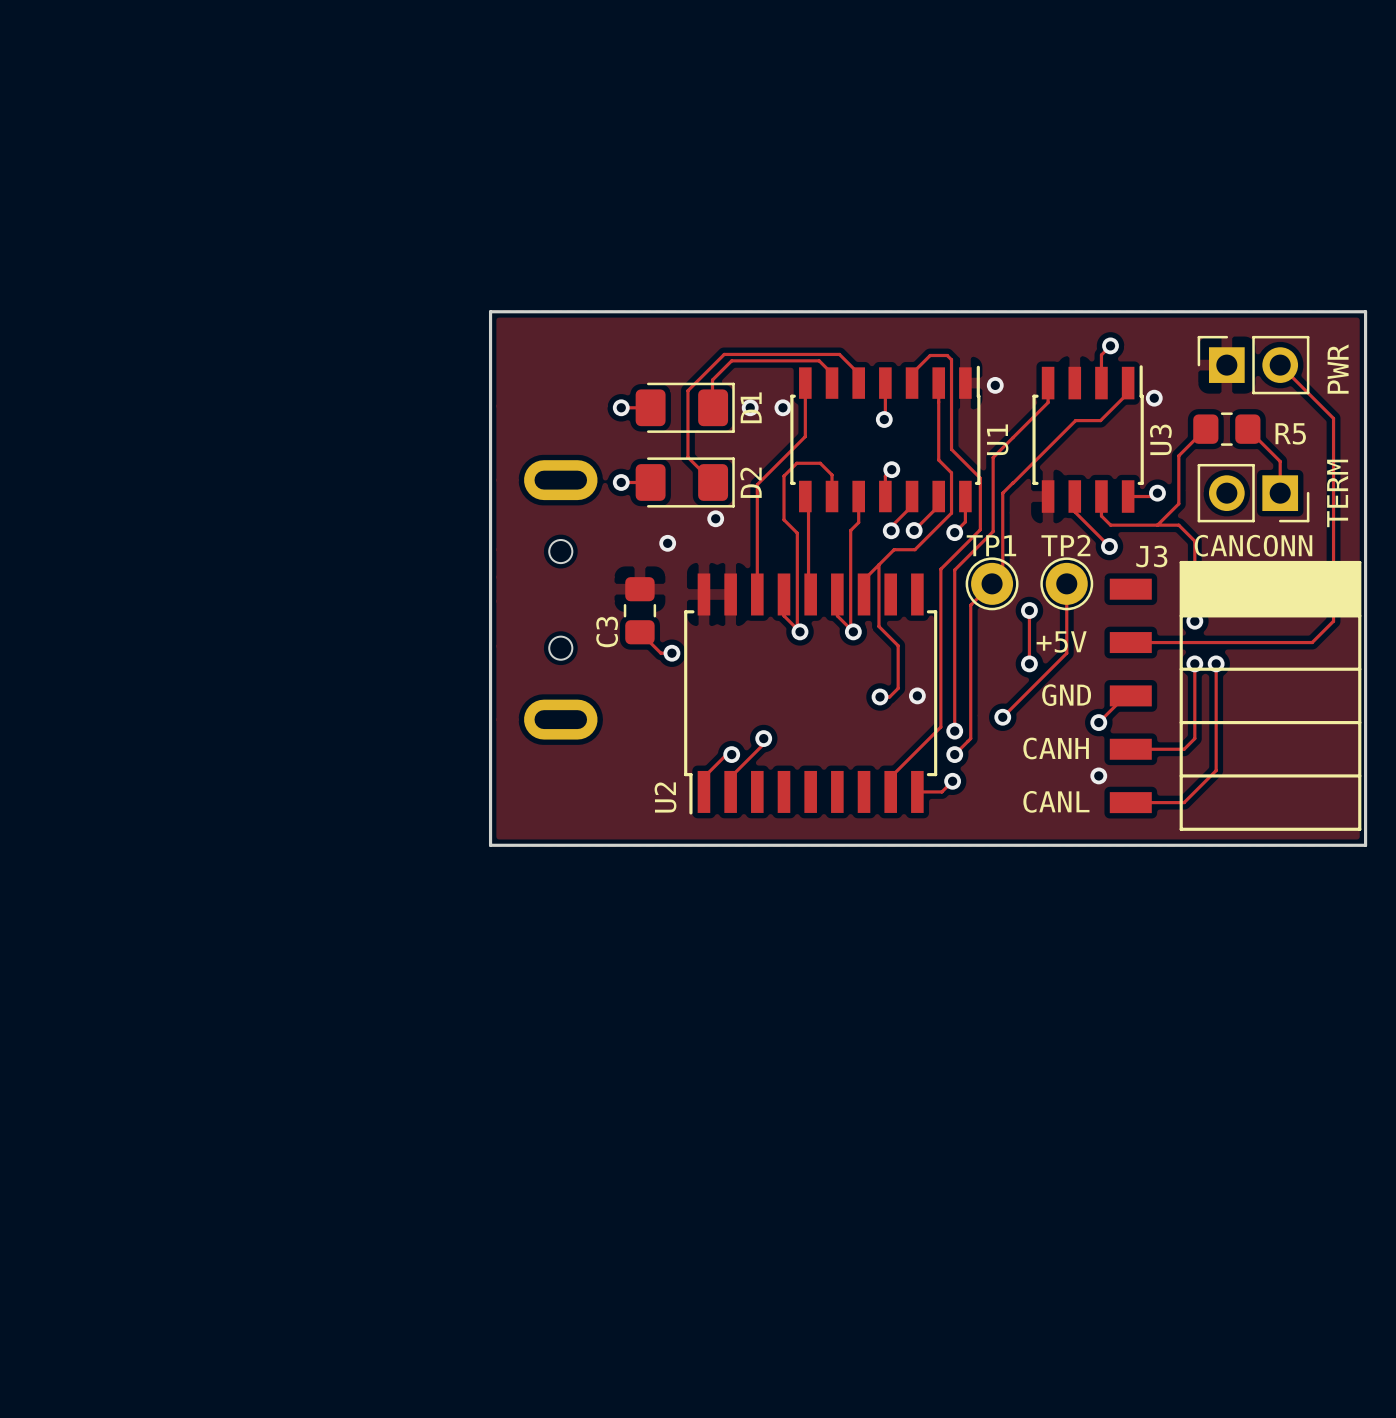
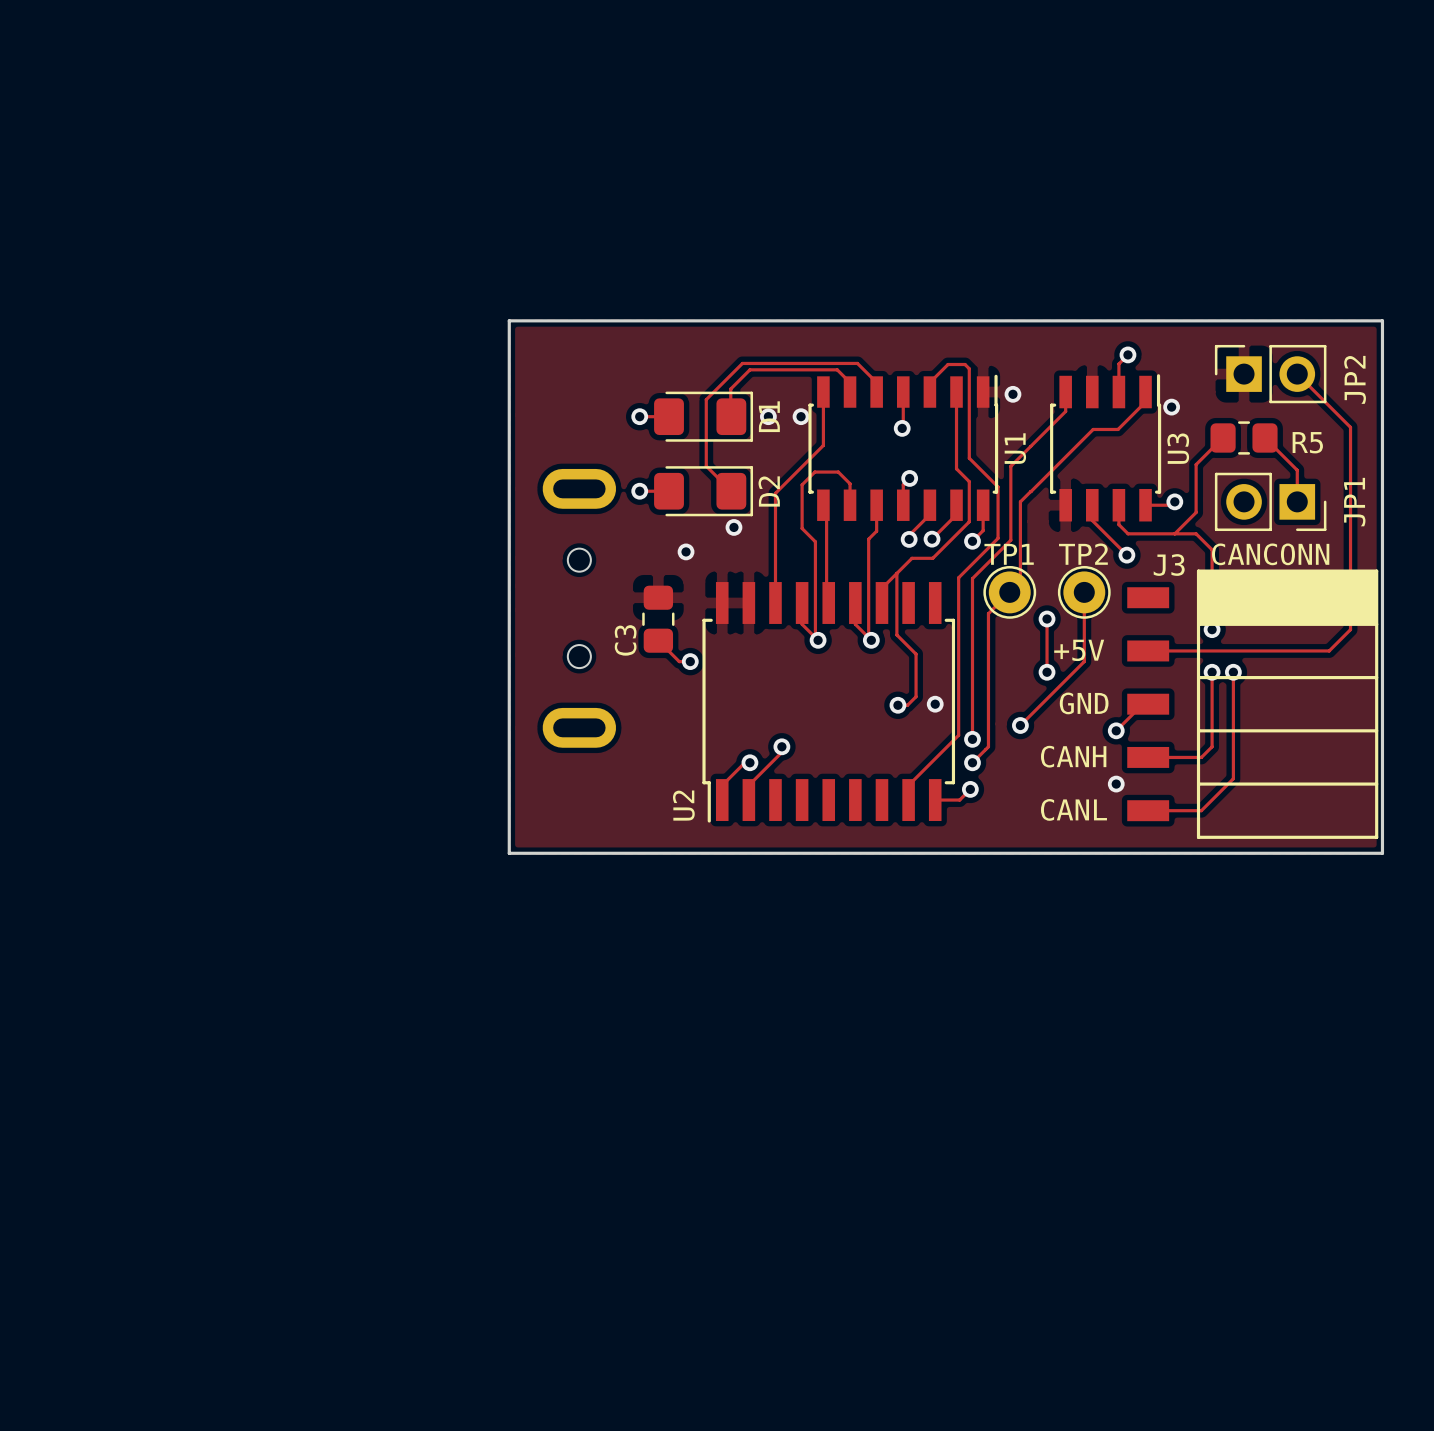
PWR name: PWR (1338, 369) -> JP2 (1355, 379)
TERM name: TERM (1337, 493) -> JP1 (1354, 502)

